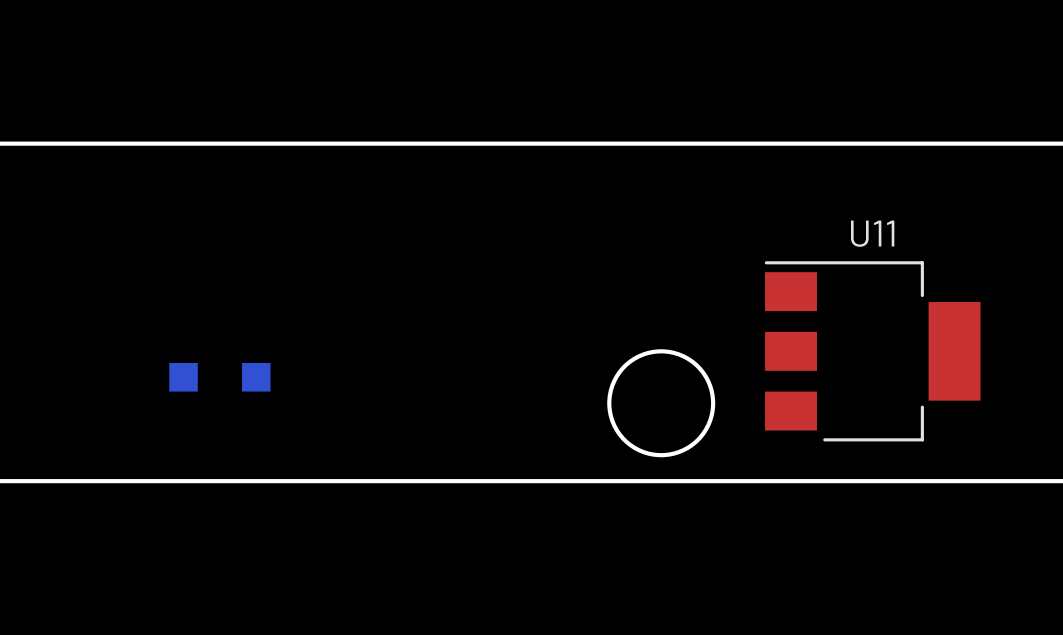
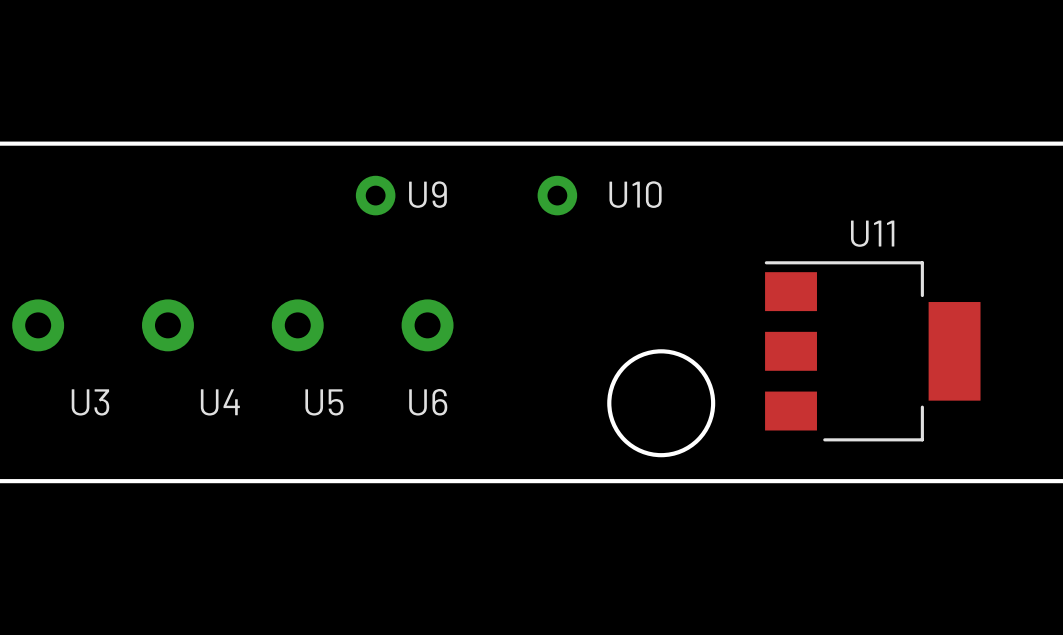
U9: none -> (375, 195)
U10: none -> (557, 195)
U3: none -> (38, 325)
U4: none -> (167, 325)
U5: none -> (297, 325)
U6: none -> (427, 325)
part: (219, 377) -> none

